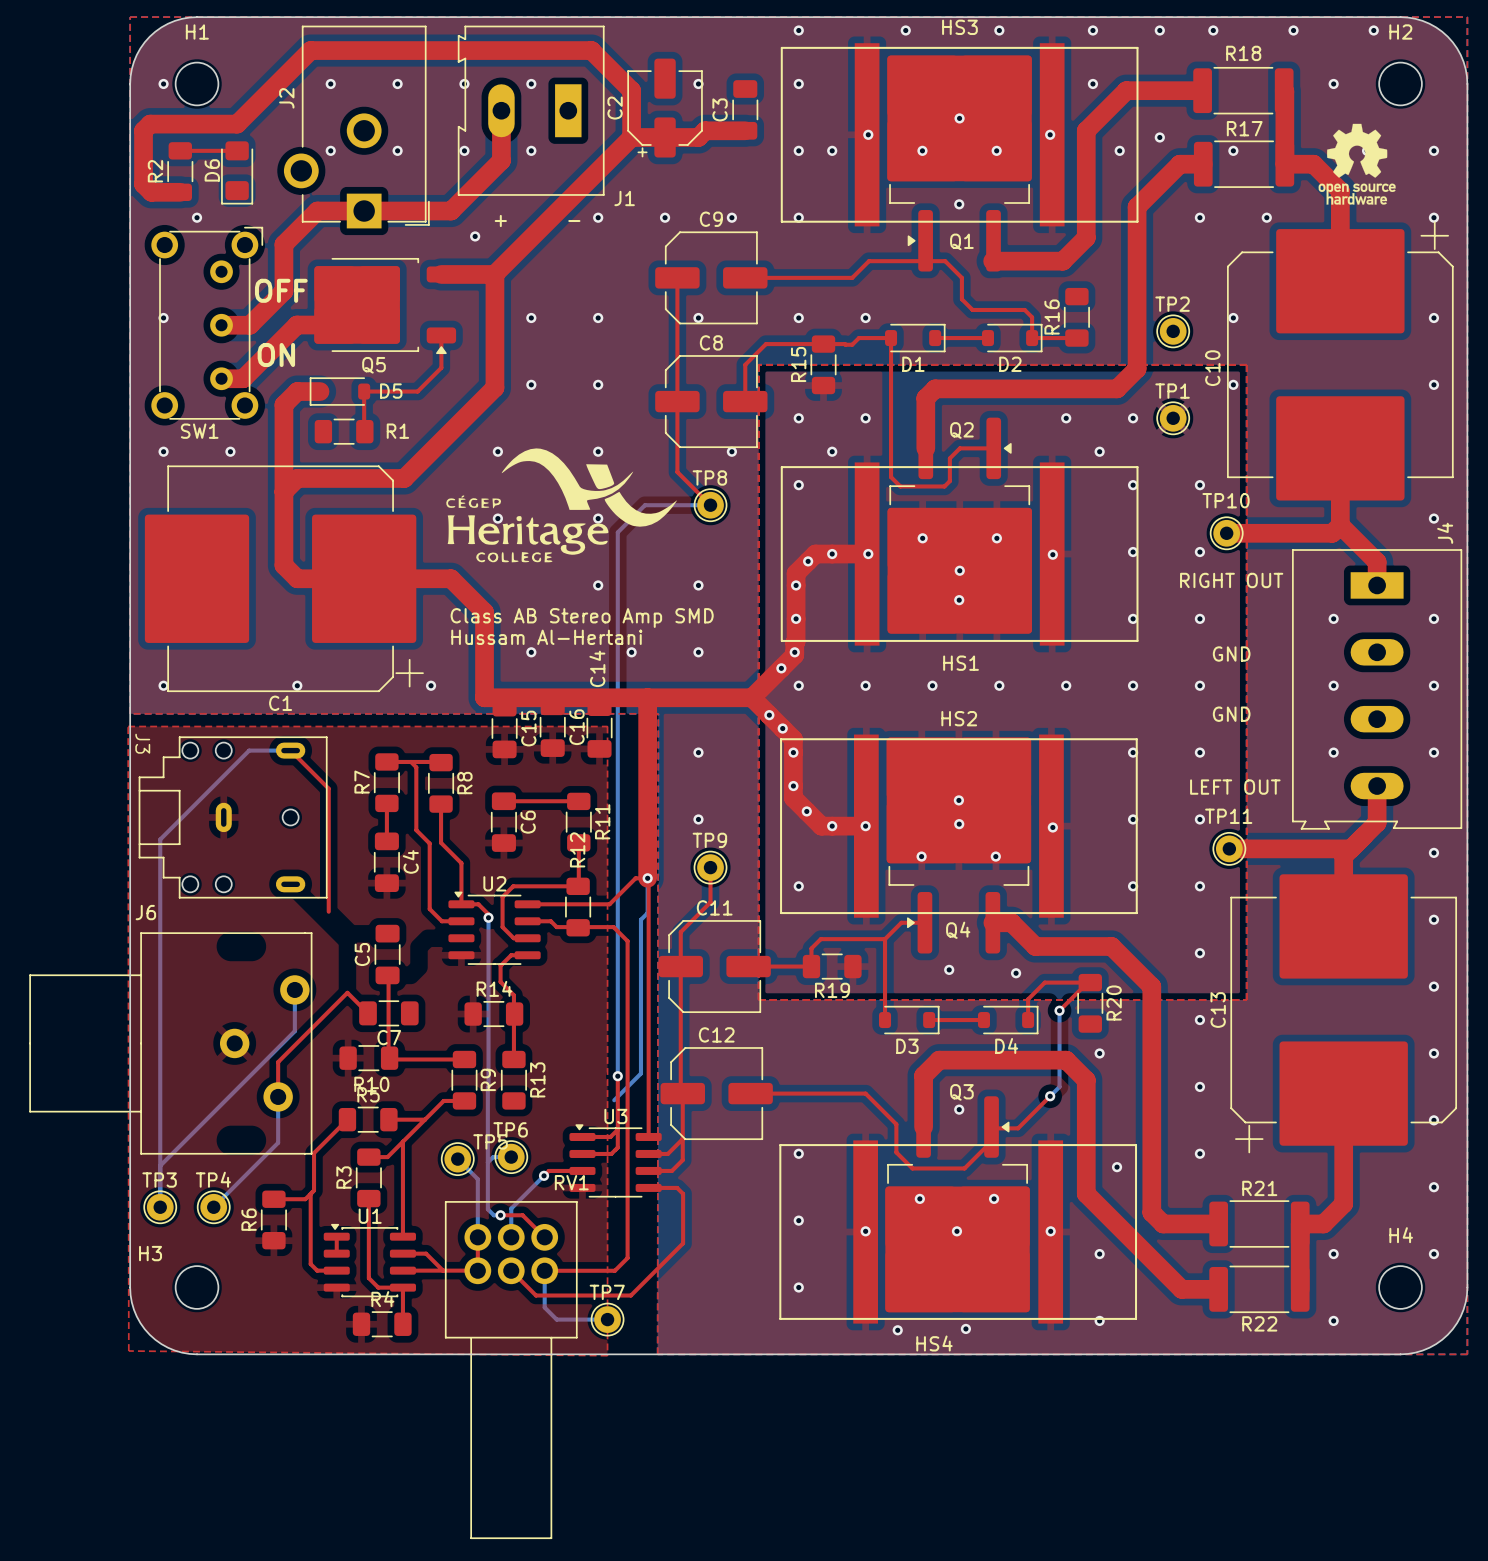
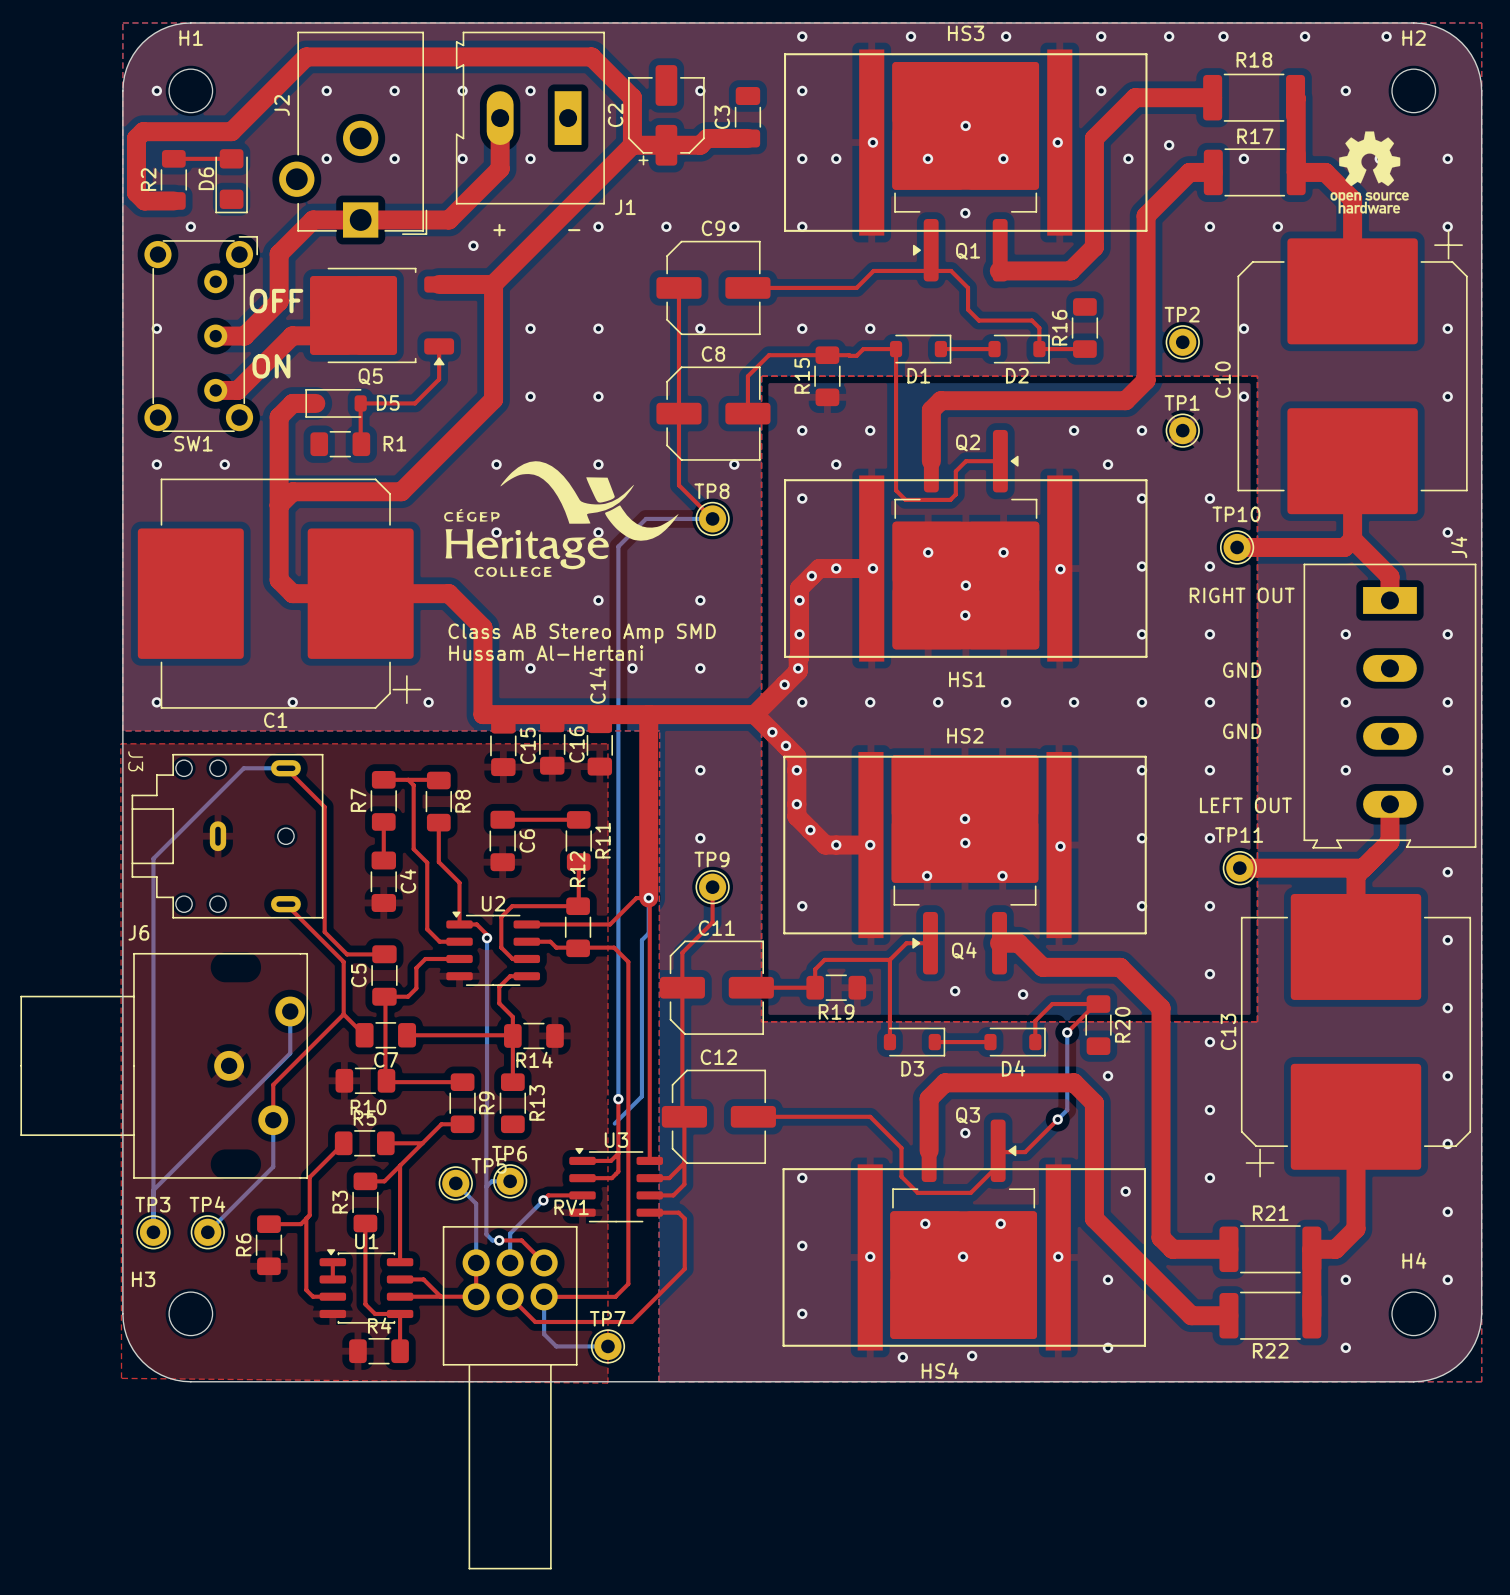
top track: none -> (285, 904) (343, 961) (343, 1014)
top track: none -> (324, 932) (347, 954) (384, 954)
top track: none -> (459, 958) (425, 958) (416, 968) (416, 988) (408, 996) (384, 996)
R14 name position: R14 (494, 988) -> R14 (534, 1059)
top track: none -> (407, 1035) (512, 1035)
R14 position: (493, 1014) -> (533, 1035)

